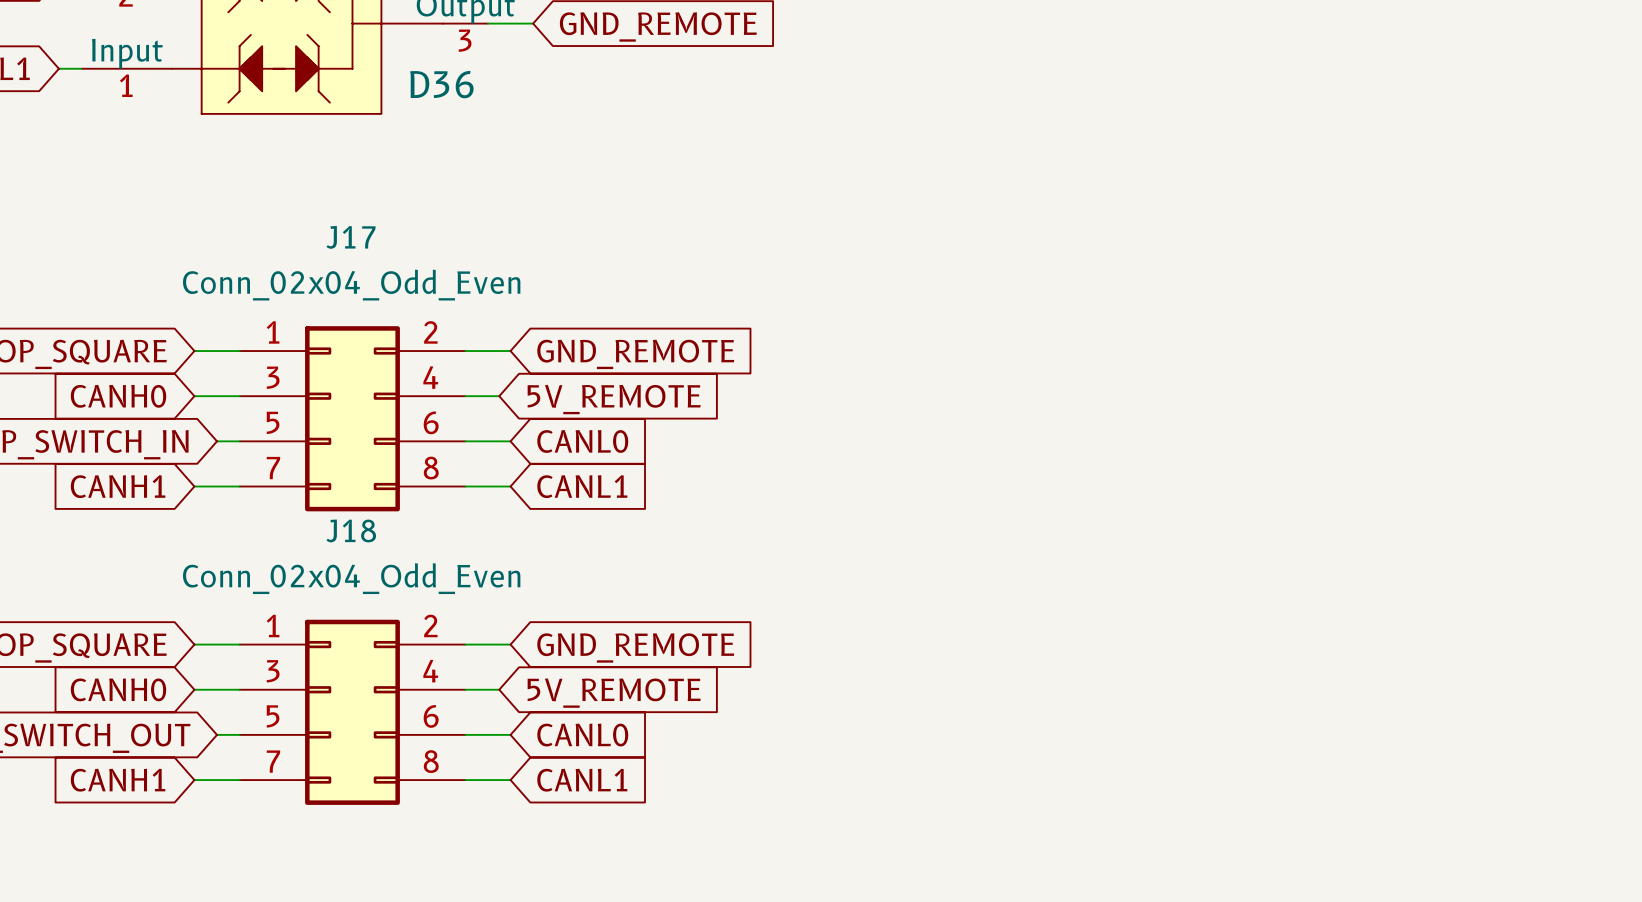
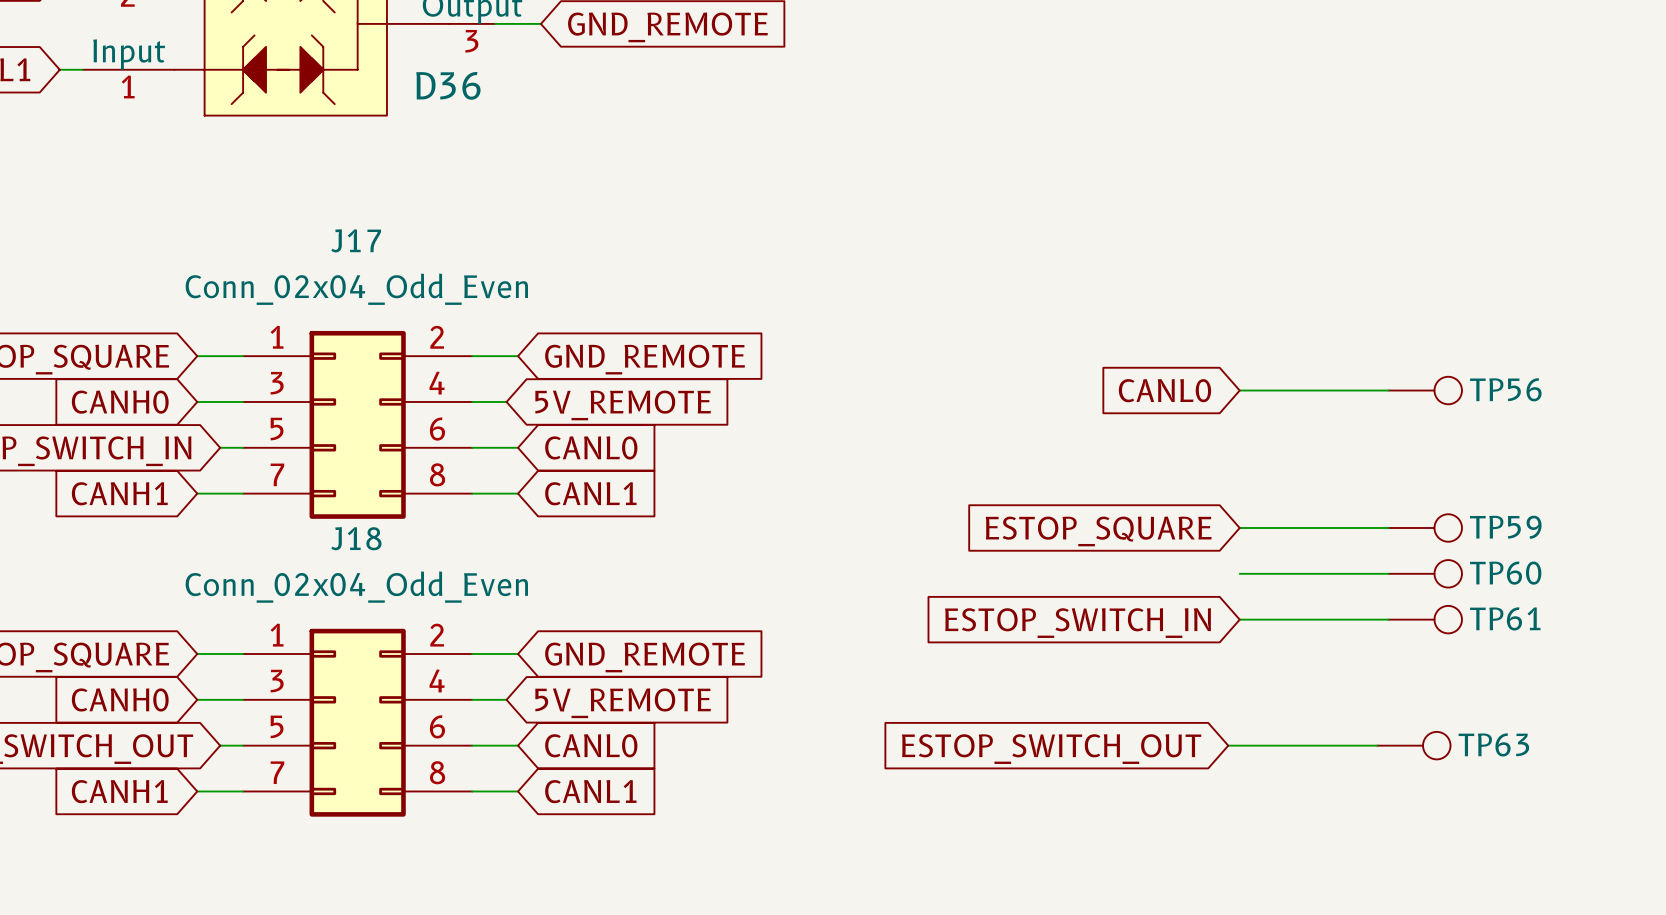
wire: none -> (1239, 390) (1388, 390)
TP56: none -> (1425, 390)
global label: none -> CANL0 (1164, 390)
wire: none -> (1239, 527) (1388, 527)
TP59: none -> (1425, 527)
global label: none -> ESTOP_SQUARE (1098, 531)
wire: none -> (1239, 573) (1388, 573)
TP60: none -> (1425, 573)
wire: none -> (1239, 619) (1388, 619)
TP61: none -> (1425, 619)
global label: none -> ESTOP_SWITCH_IN (1077, 623)
wire: none -> (1228, 745) (1377, 745)
TP63: none -> (1413, 745)
global label: none -> ESTOP_SWITCH_OUT (1051, 749)

